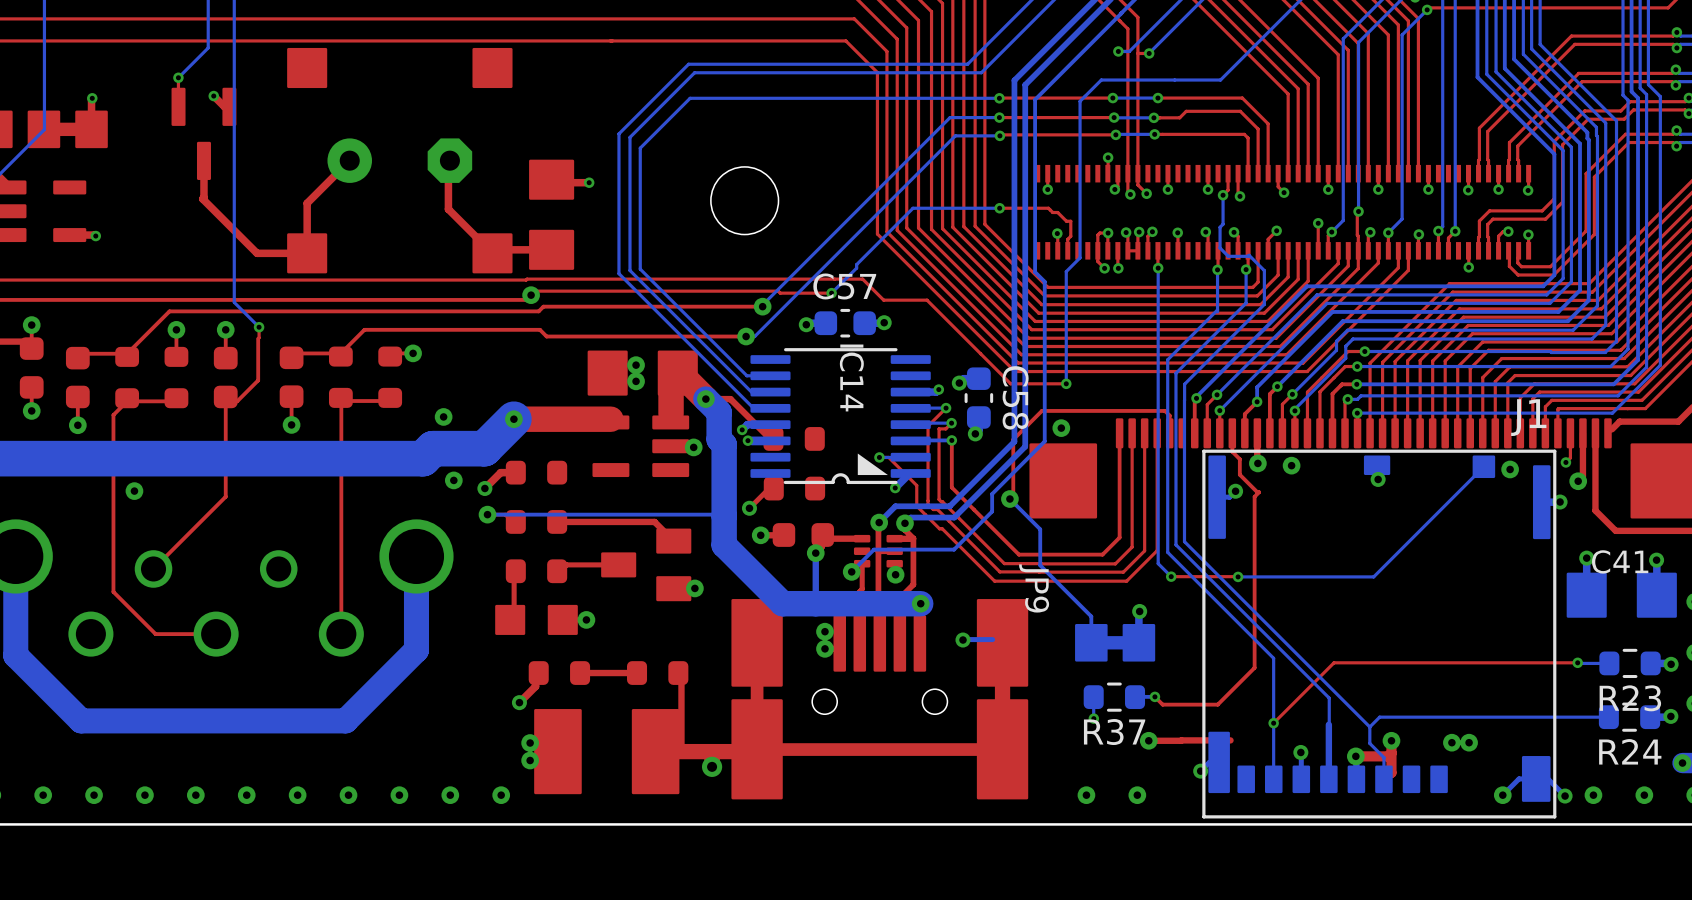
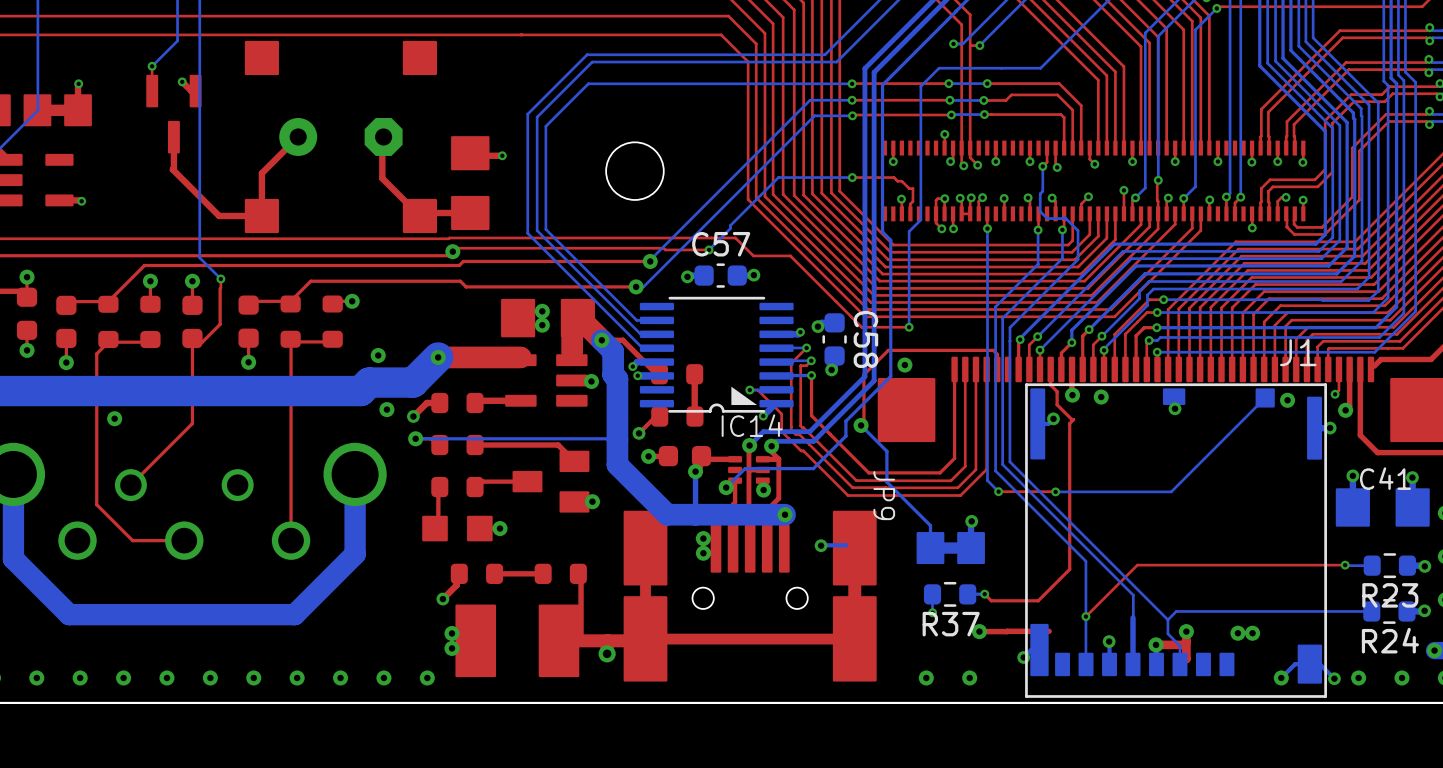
IC14 name rotation: 0° (851, 377) -> 90° counterclockwise (752, 425)
IC14 name position: IC14 (851, 377) -> IC14 (752, 425)
top track: none -> (694, 374) (694, 416)
top track: none -> (520, 400) (477, 400) (475, 402)

